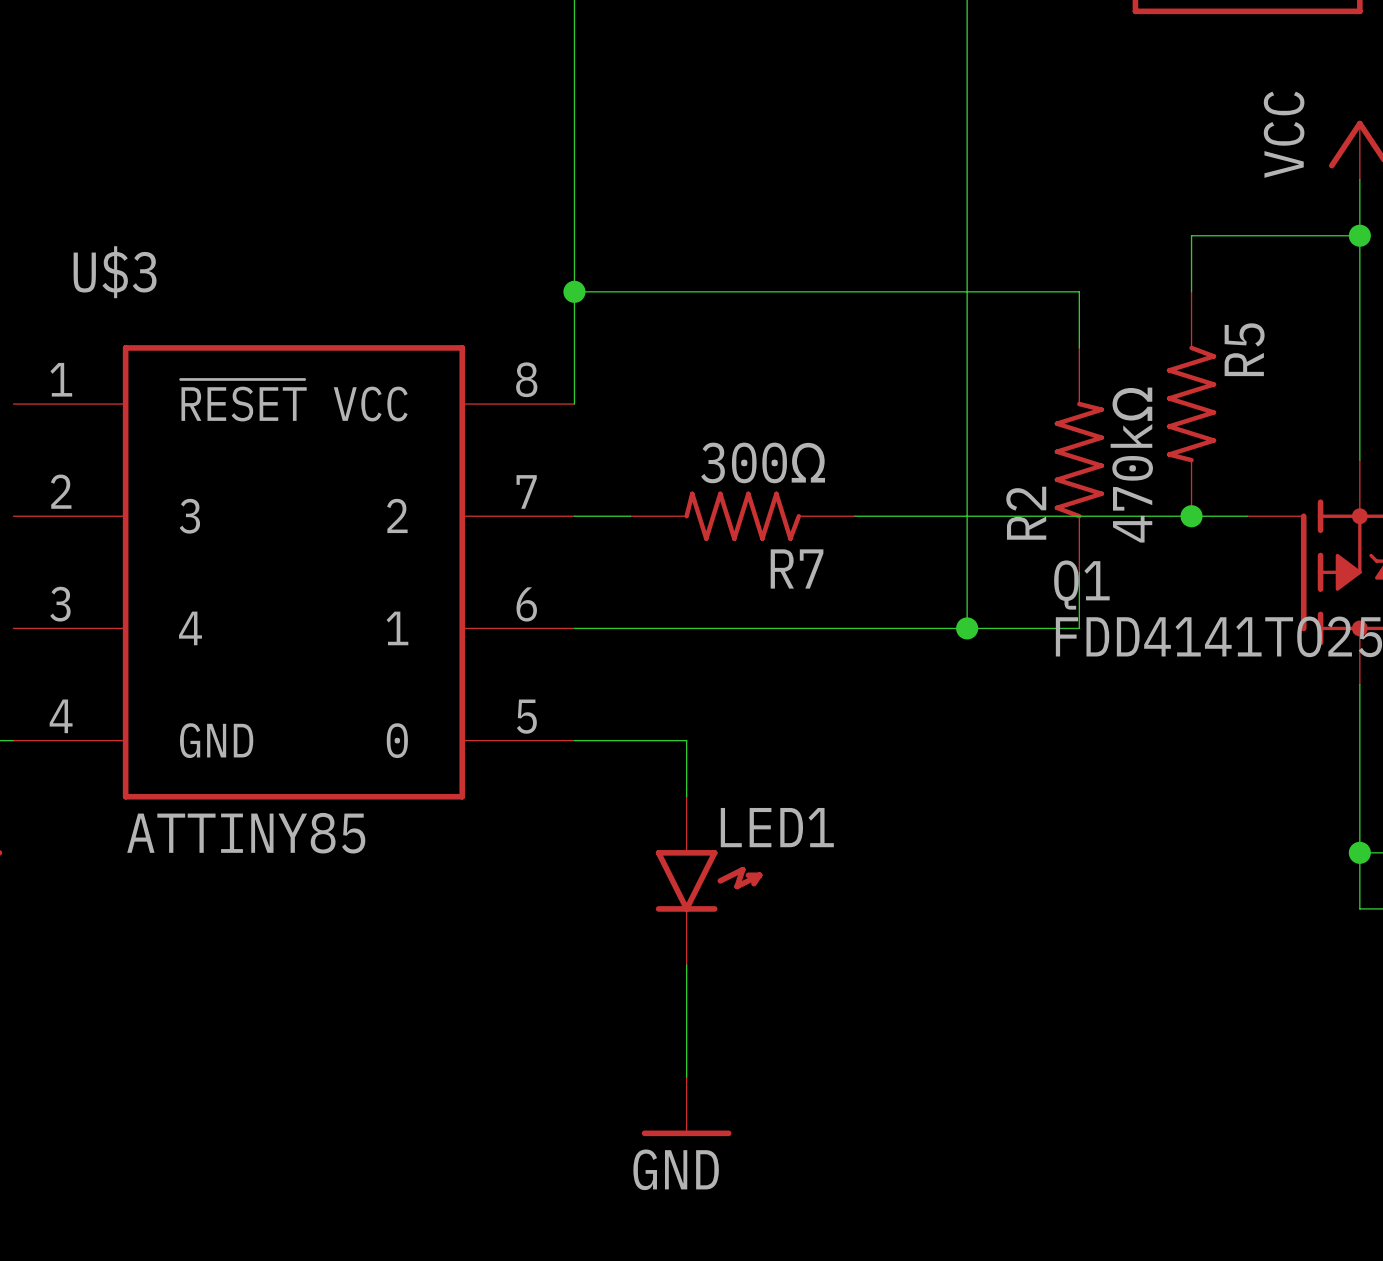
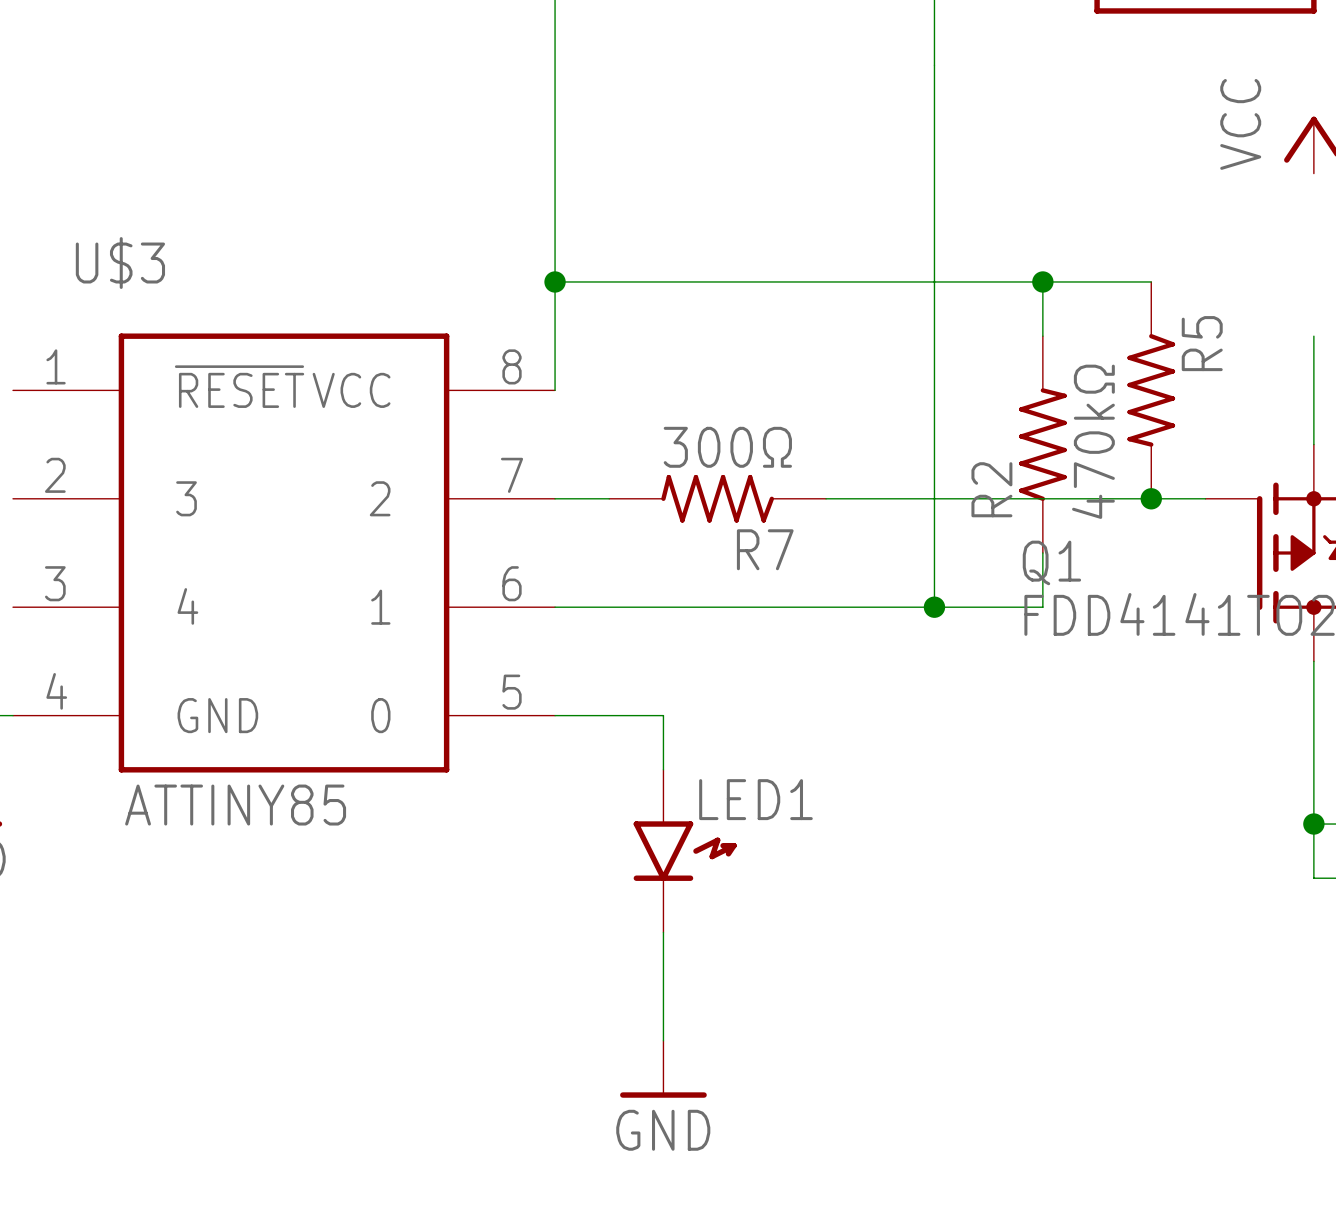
wire: (1359, 179) (1359, 347) -> none
wire: (1359, 235) (1191, 235) (1191, 291) -> (1042, 281) (1151, 281)
junction: (1359, 235) -> none
junction: none -> (1042, 281)

